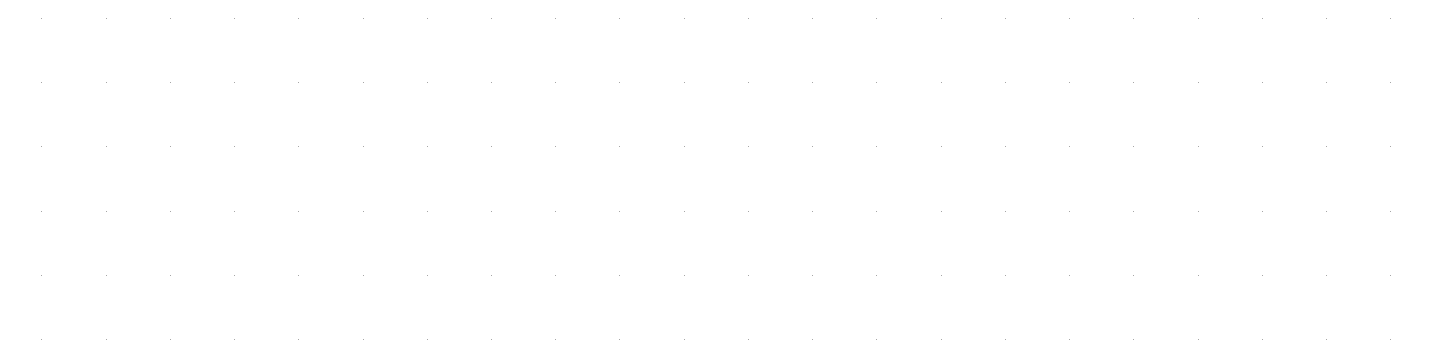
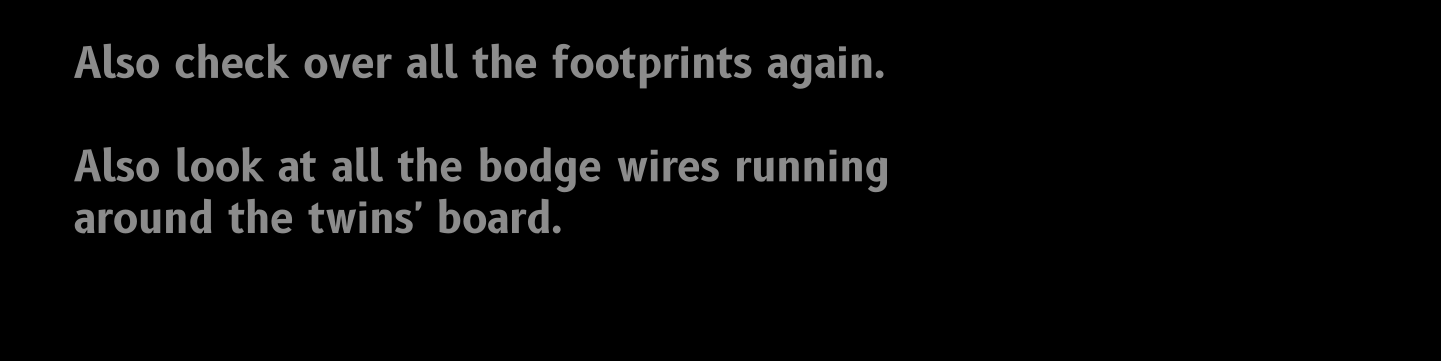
text: none -> Also check over all the footprints again. (478, 66)
text: none -> Also look at all the bodge wires running (480, 169)
text: none -> around the twins' board. (317, 216)

